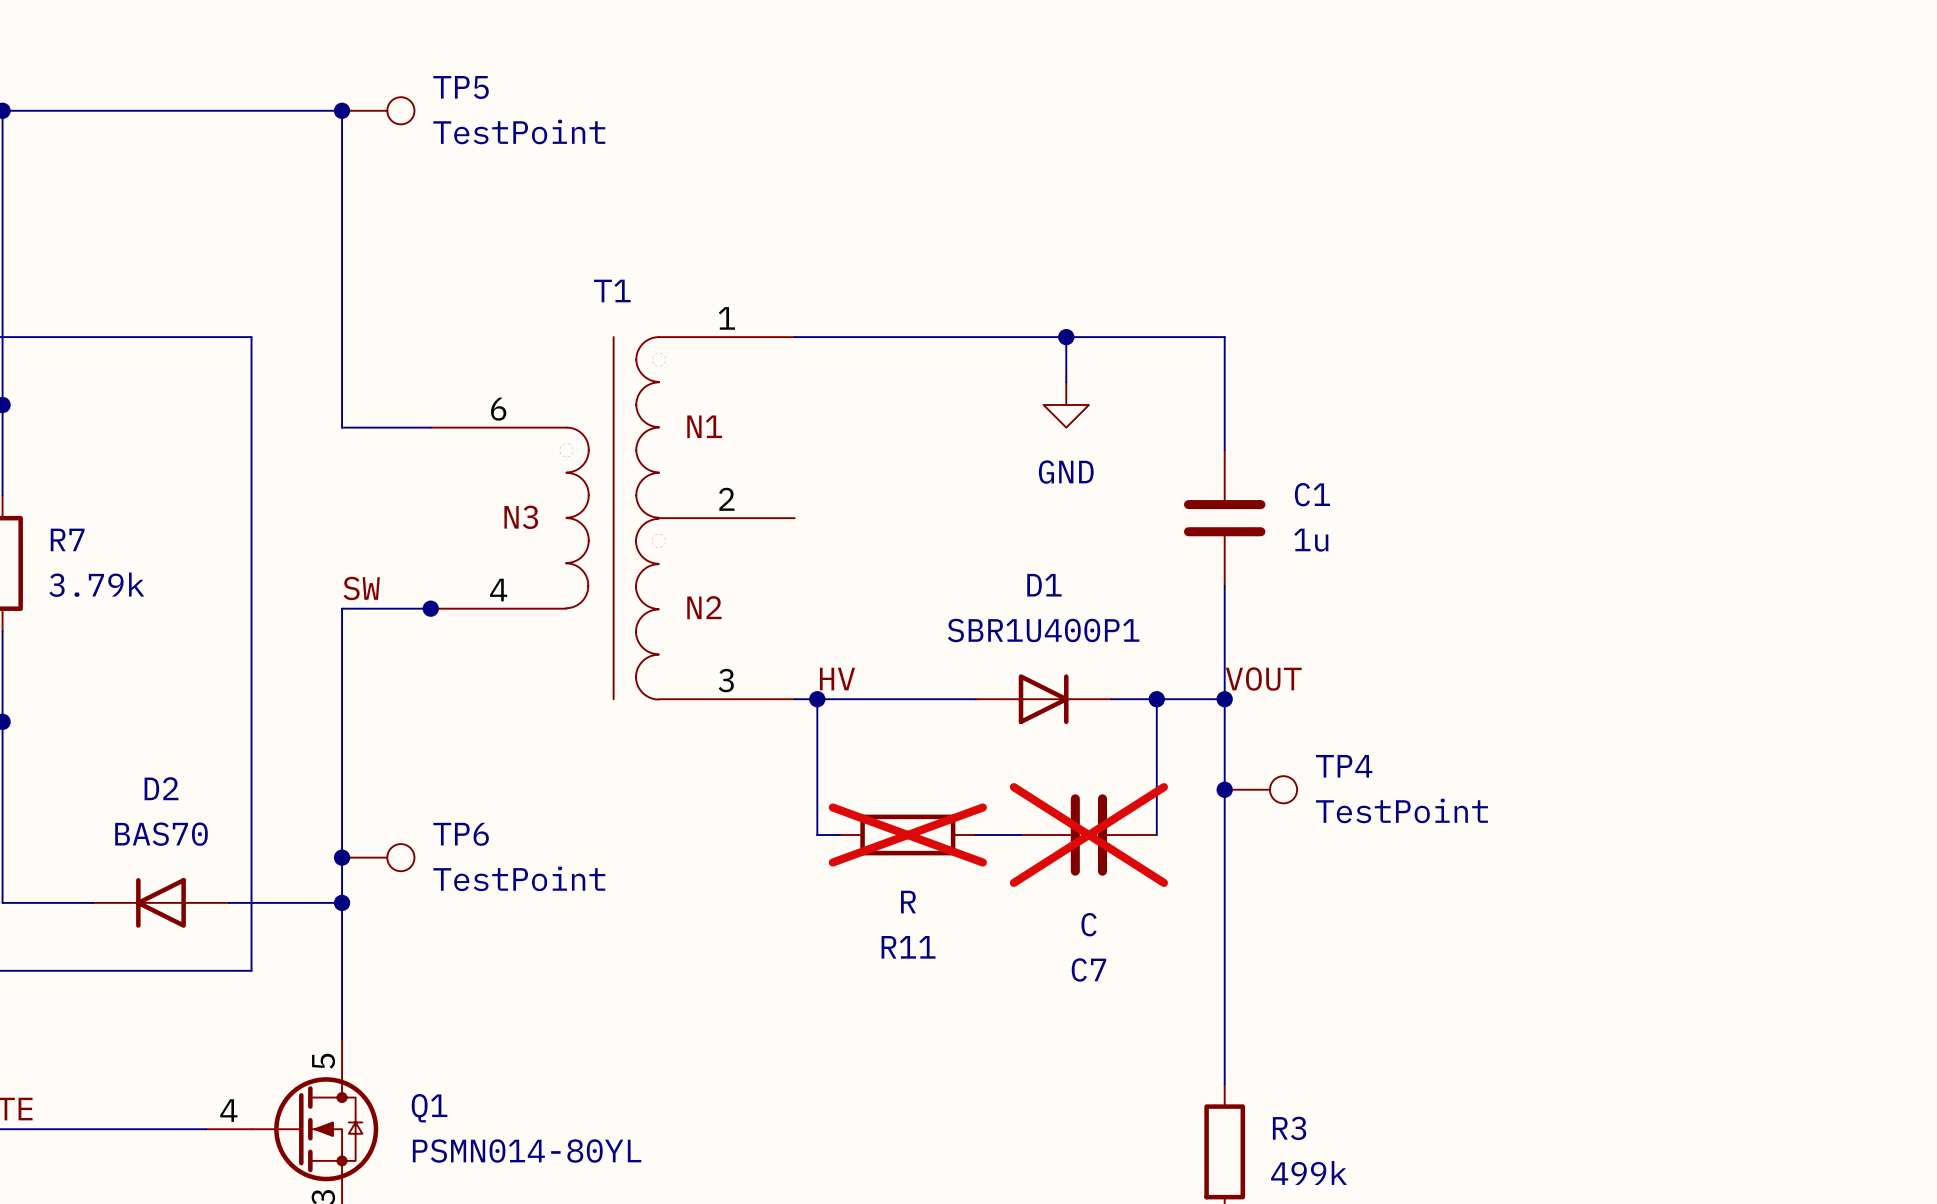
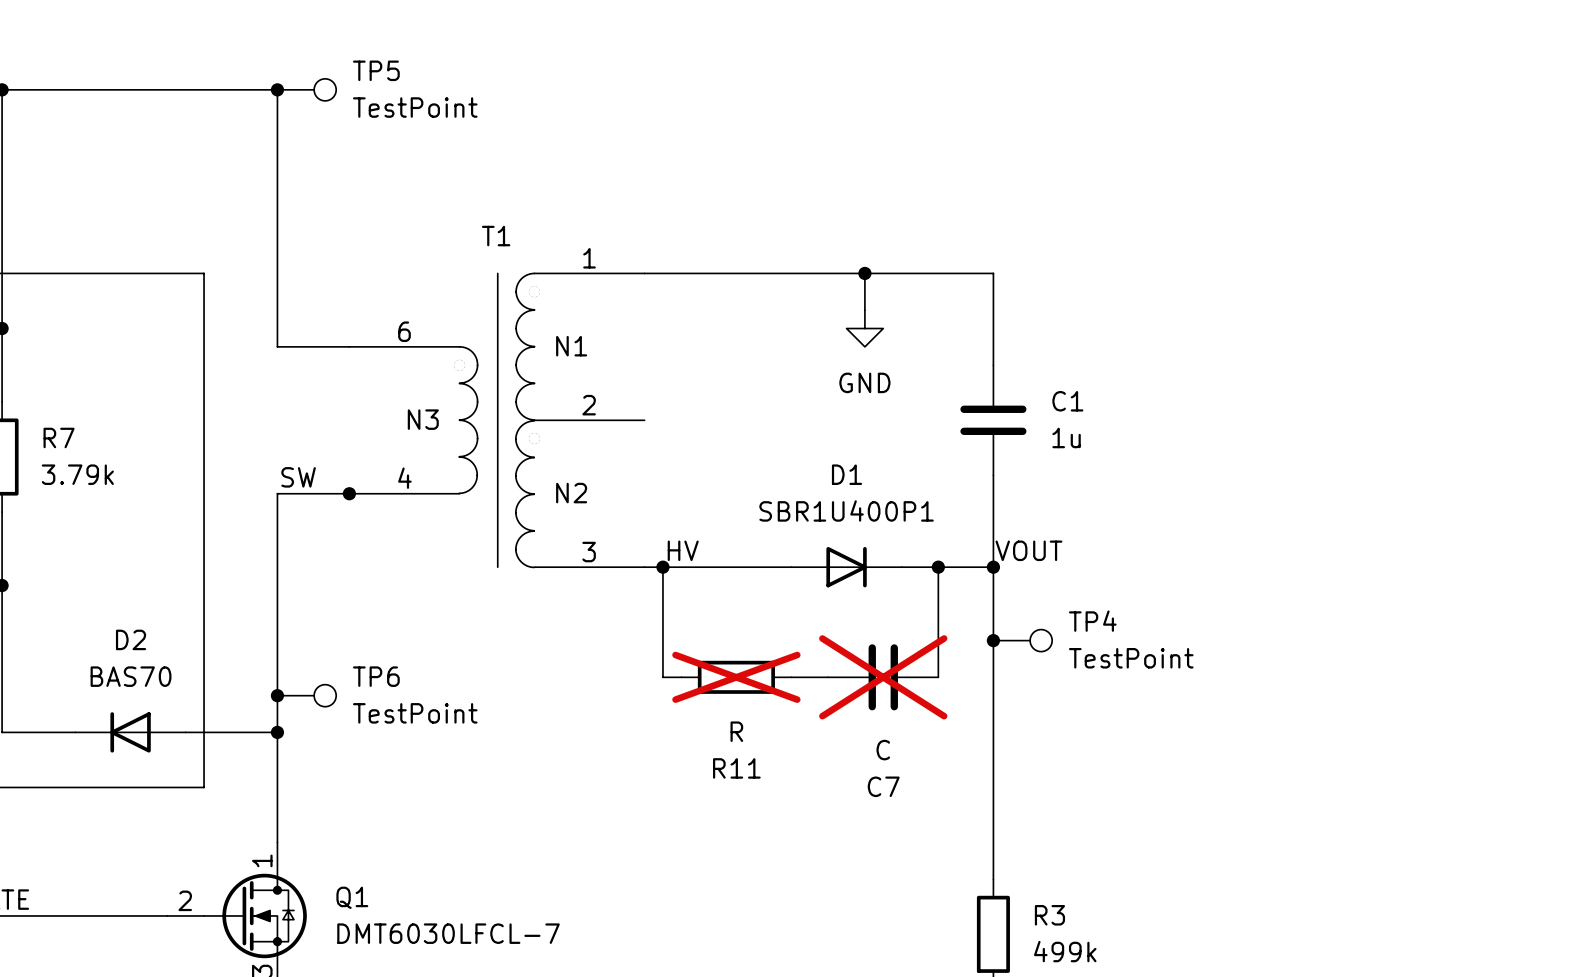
Q1 pin number: 5 (323, 1061) -> 1 (262, 860)
Q1 pin number: 4 (228, 1110) -> 2 (185, 900)
Q1 value: PSMN014-80YL (527, 1151) -> DMT6030LFCL-7 (448, 933)

